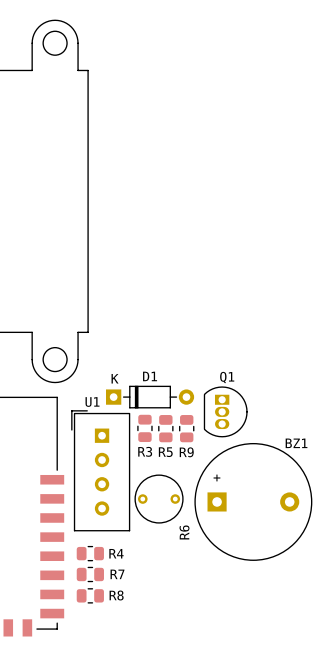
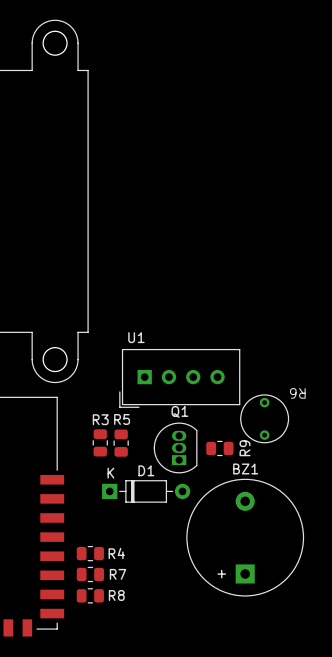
D1 position: (150, 397) -> (146, 491)
U1 name position: U1 (92, 401) -> U1 (136, 337)
Q1 rotation: 0° (225, 411) -> 180° (175, 447)
Q1 position: (225, 411) -> (175, 447)
R3 position: (144, 428) -> (100, 442)
R5 position: (165, 428) -> (121, 443)
R9 rotation: 0° (186, 428) -> 90° clockwise (219, 448)
R9 position: (186, 428) -> (219, 448)
BZ1 name position: BZ1 (296, 443) -> BZ1 (245, 468)
R3 name position: R3 (145, 451) -> R3 (100, 419)
R5 name position: R5 (165, 452) -> R5 (122, 419)
R9 name position: R9 (186, 452) -> R9 (245, 448)
U1 rotation: 0° (100, 470) -> 90° counterclockwise (179, 378)
U1 position: (100, 470) -> (179, 378)
R6 rotation: 0° (159, 499) -> 90° clockwise (264, 418)
R6 position: (159, 499) -> (264, 418)
BZ1 rotation: 0° (253, 501) -> 90° counterclockwise (245, 537)
R6 name position: R6 (184, 532) -> R6 (297, 393)

